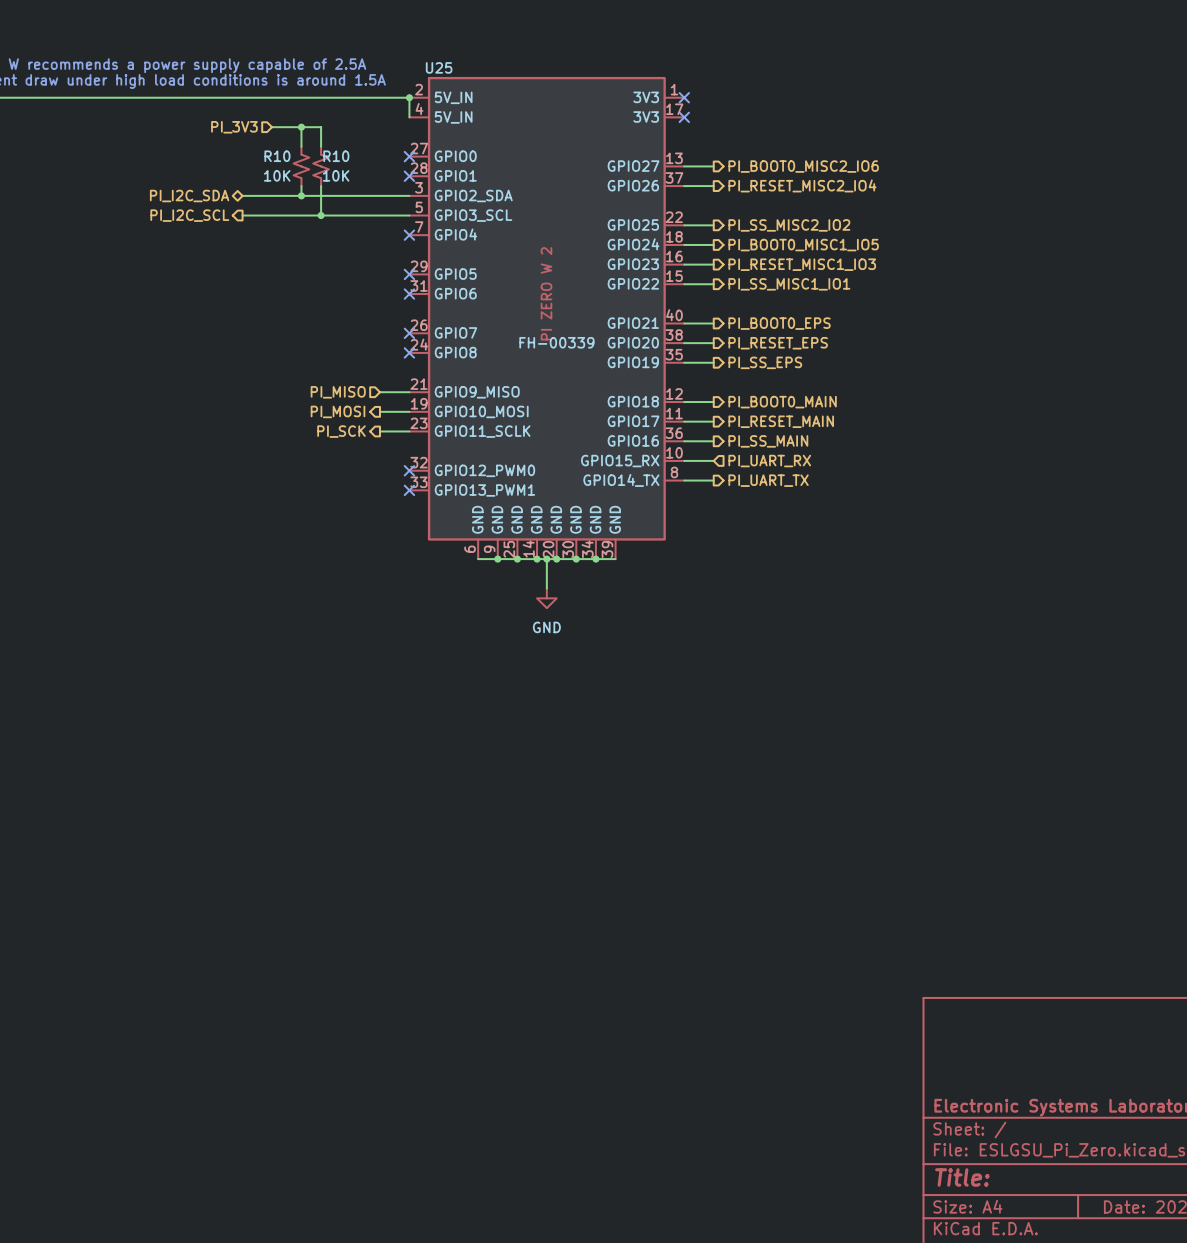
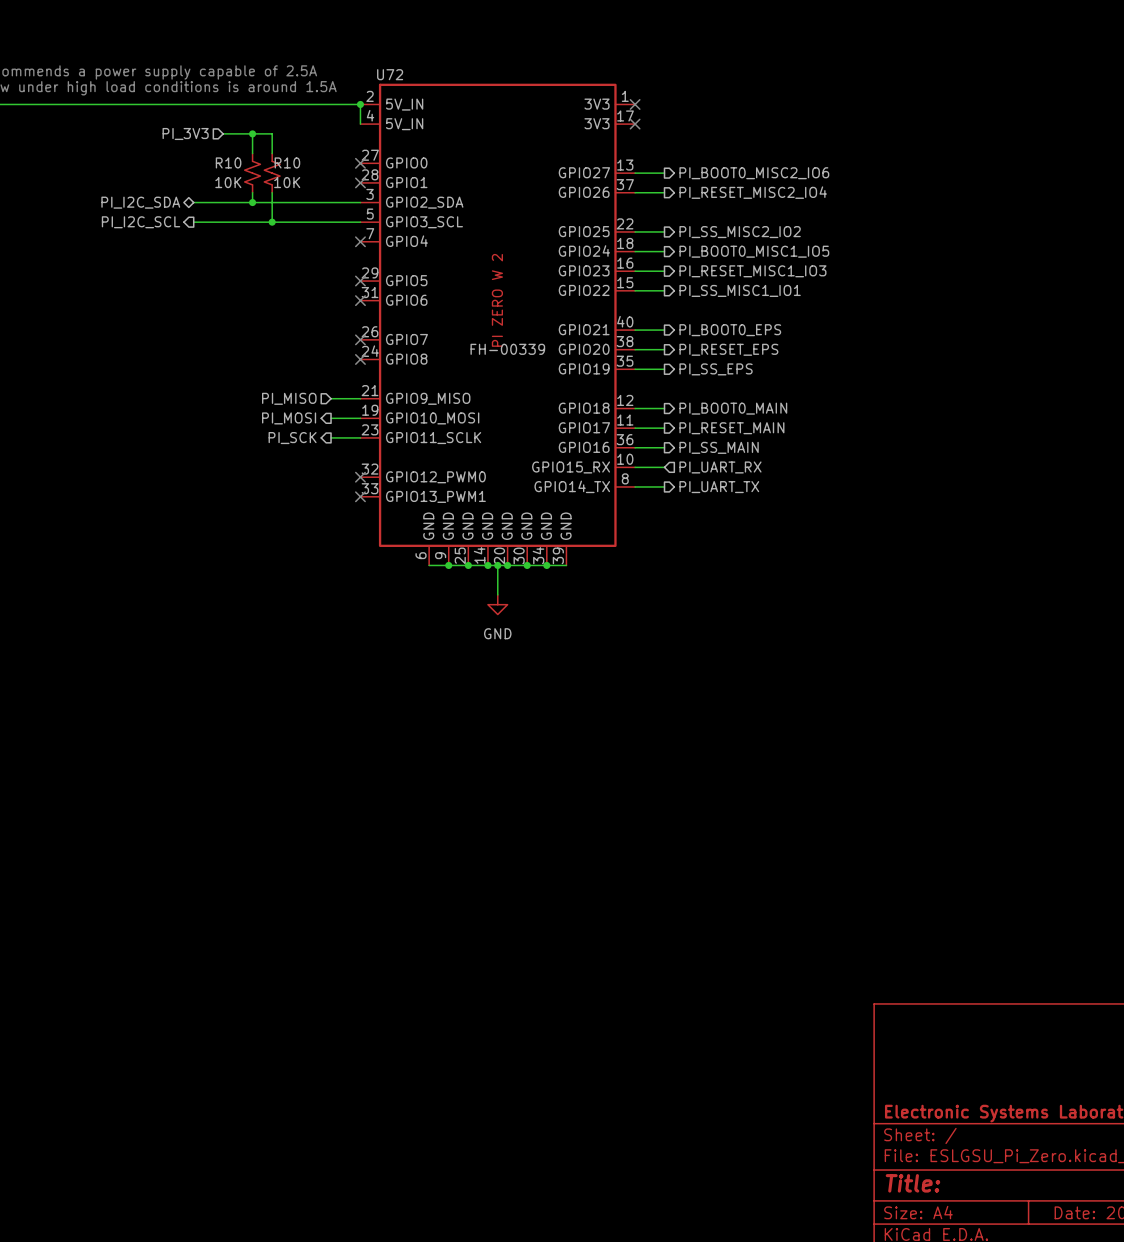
U25 name: U25 (439, 67) -> U72 (390, 74)

